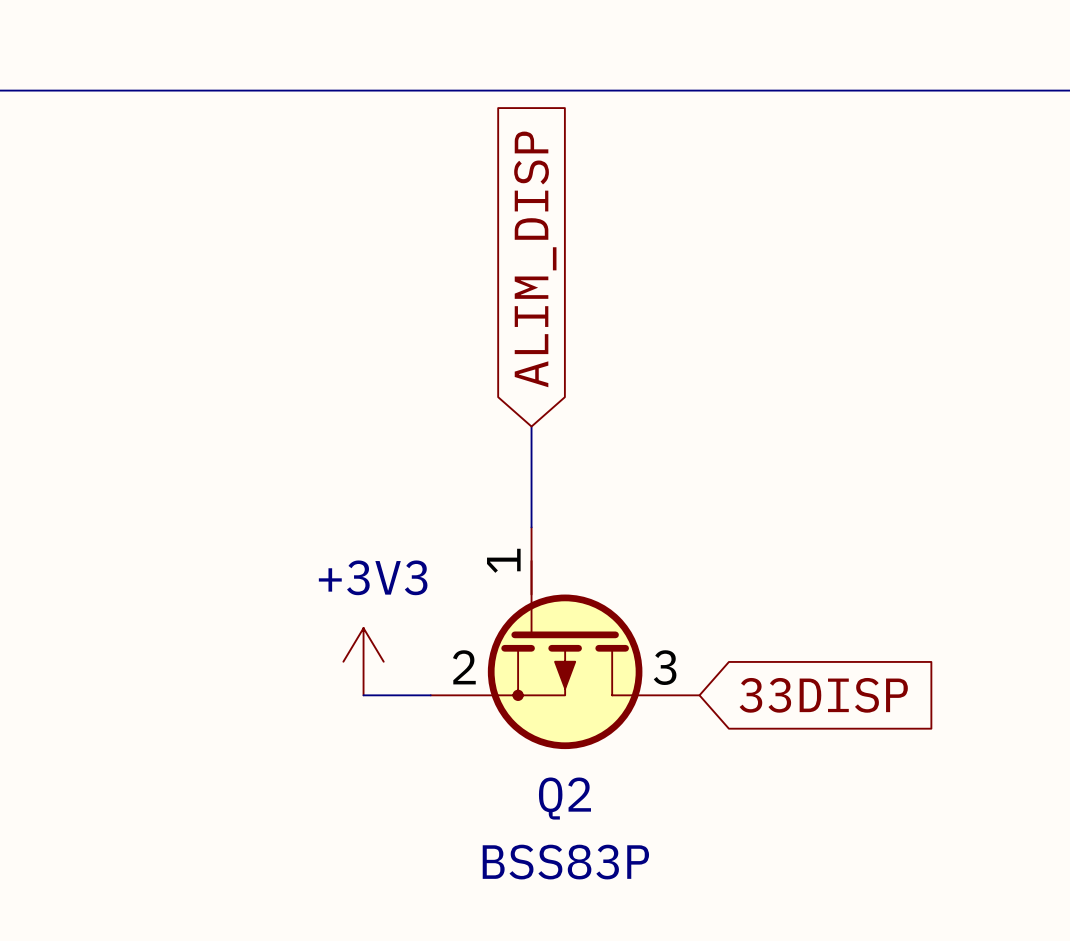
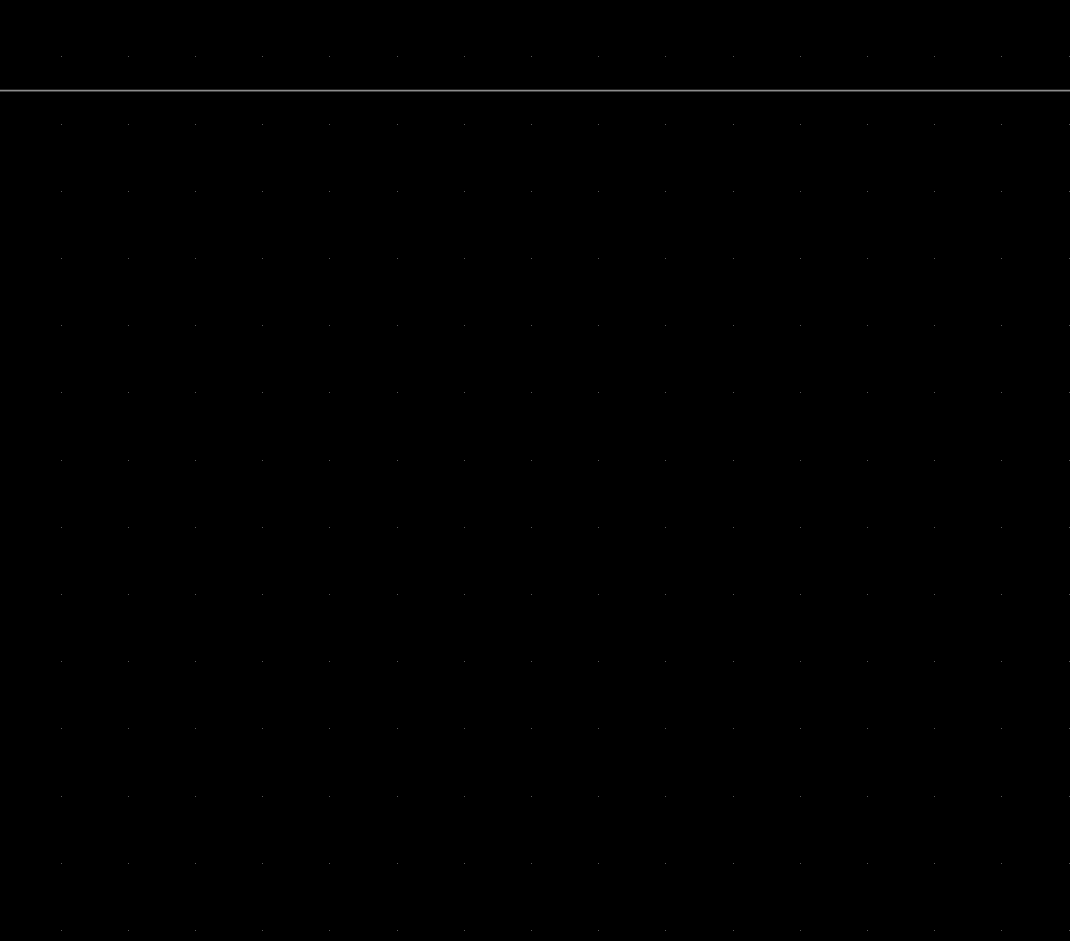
global label: ALIM_DISP (535, 259) -> none
wire: (531, 426) (531, 527) -> none
Q2: BSS83P (565, 638) -> none
power symbol: +3V3 (363, 661) -> none
wire: (363, 695) (430, 695) -> none
global label: 33DISP (823, 695) -> none

